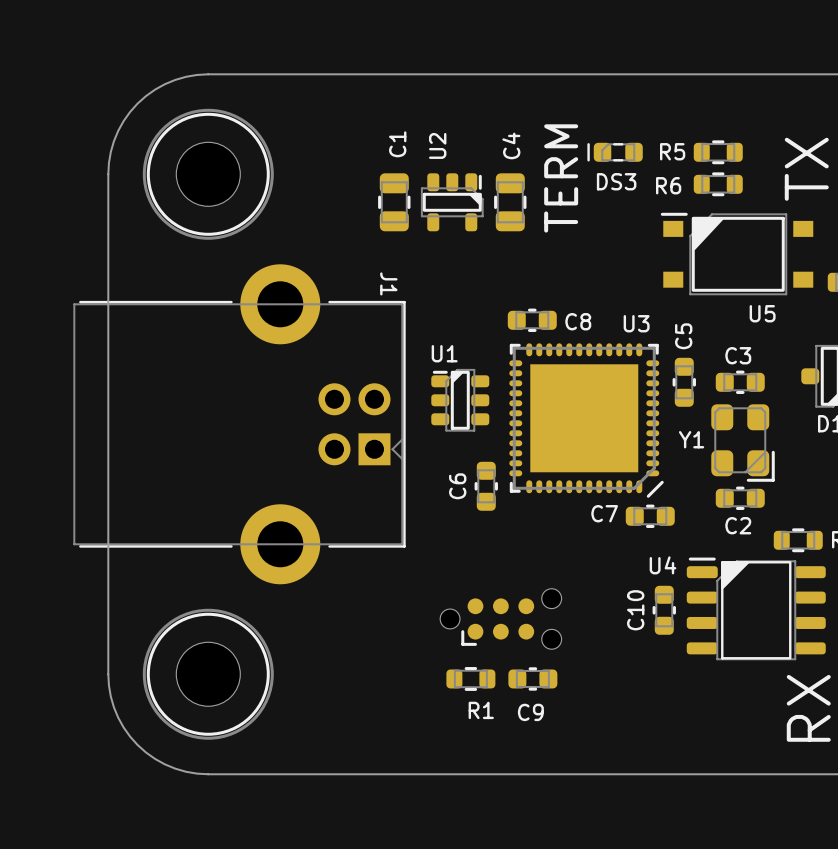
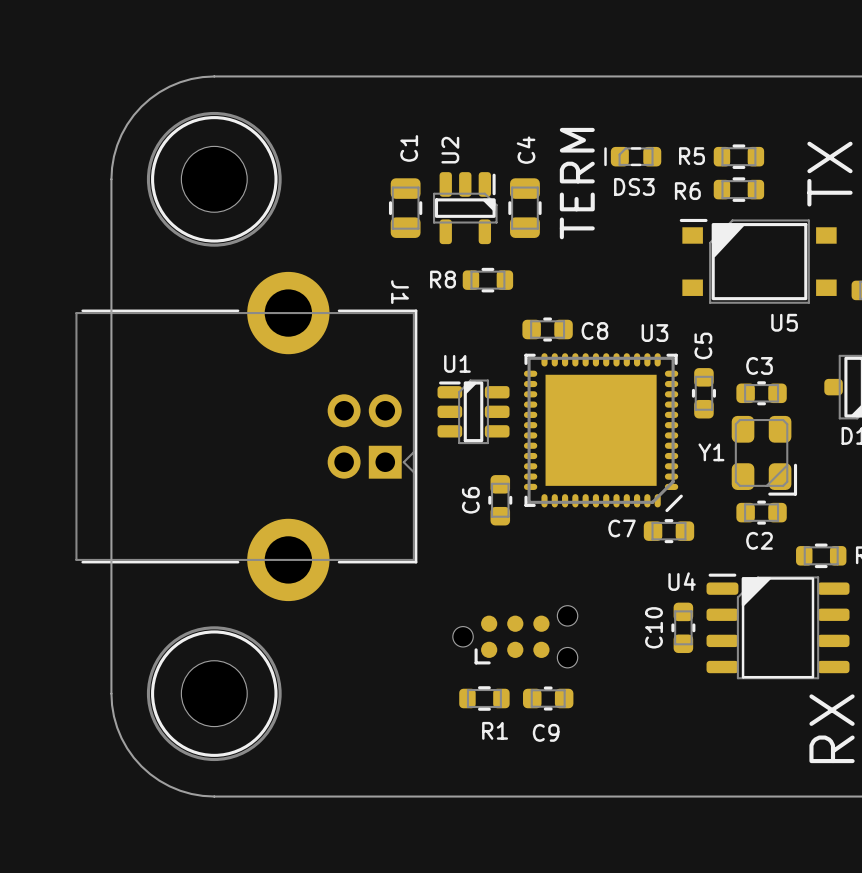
U2 footprint: [420, 173, 484, 232] -> [432, 172, 498, 245]
R8: none -> (487, 280)
U1 footprint: [431, 368, 490, 432] -> [437, 379, 510, 445]

